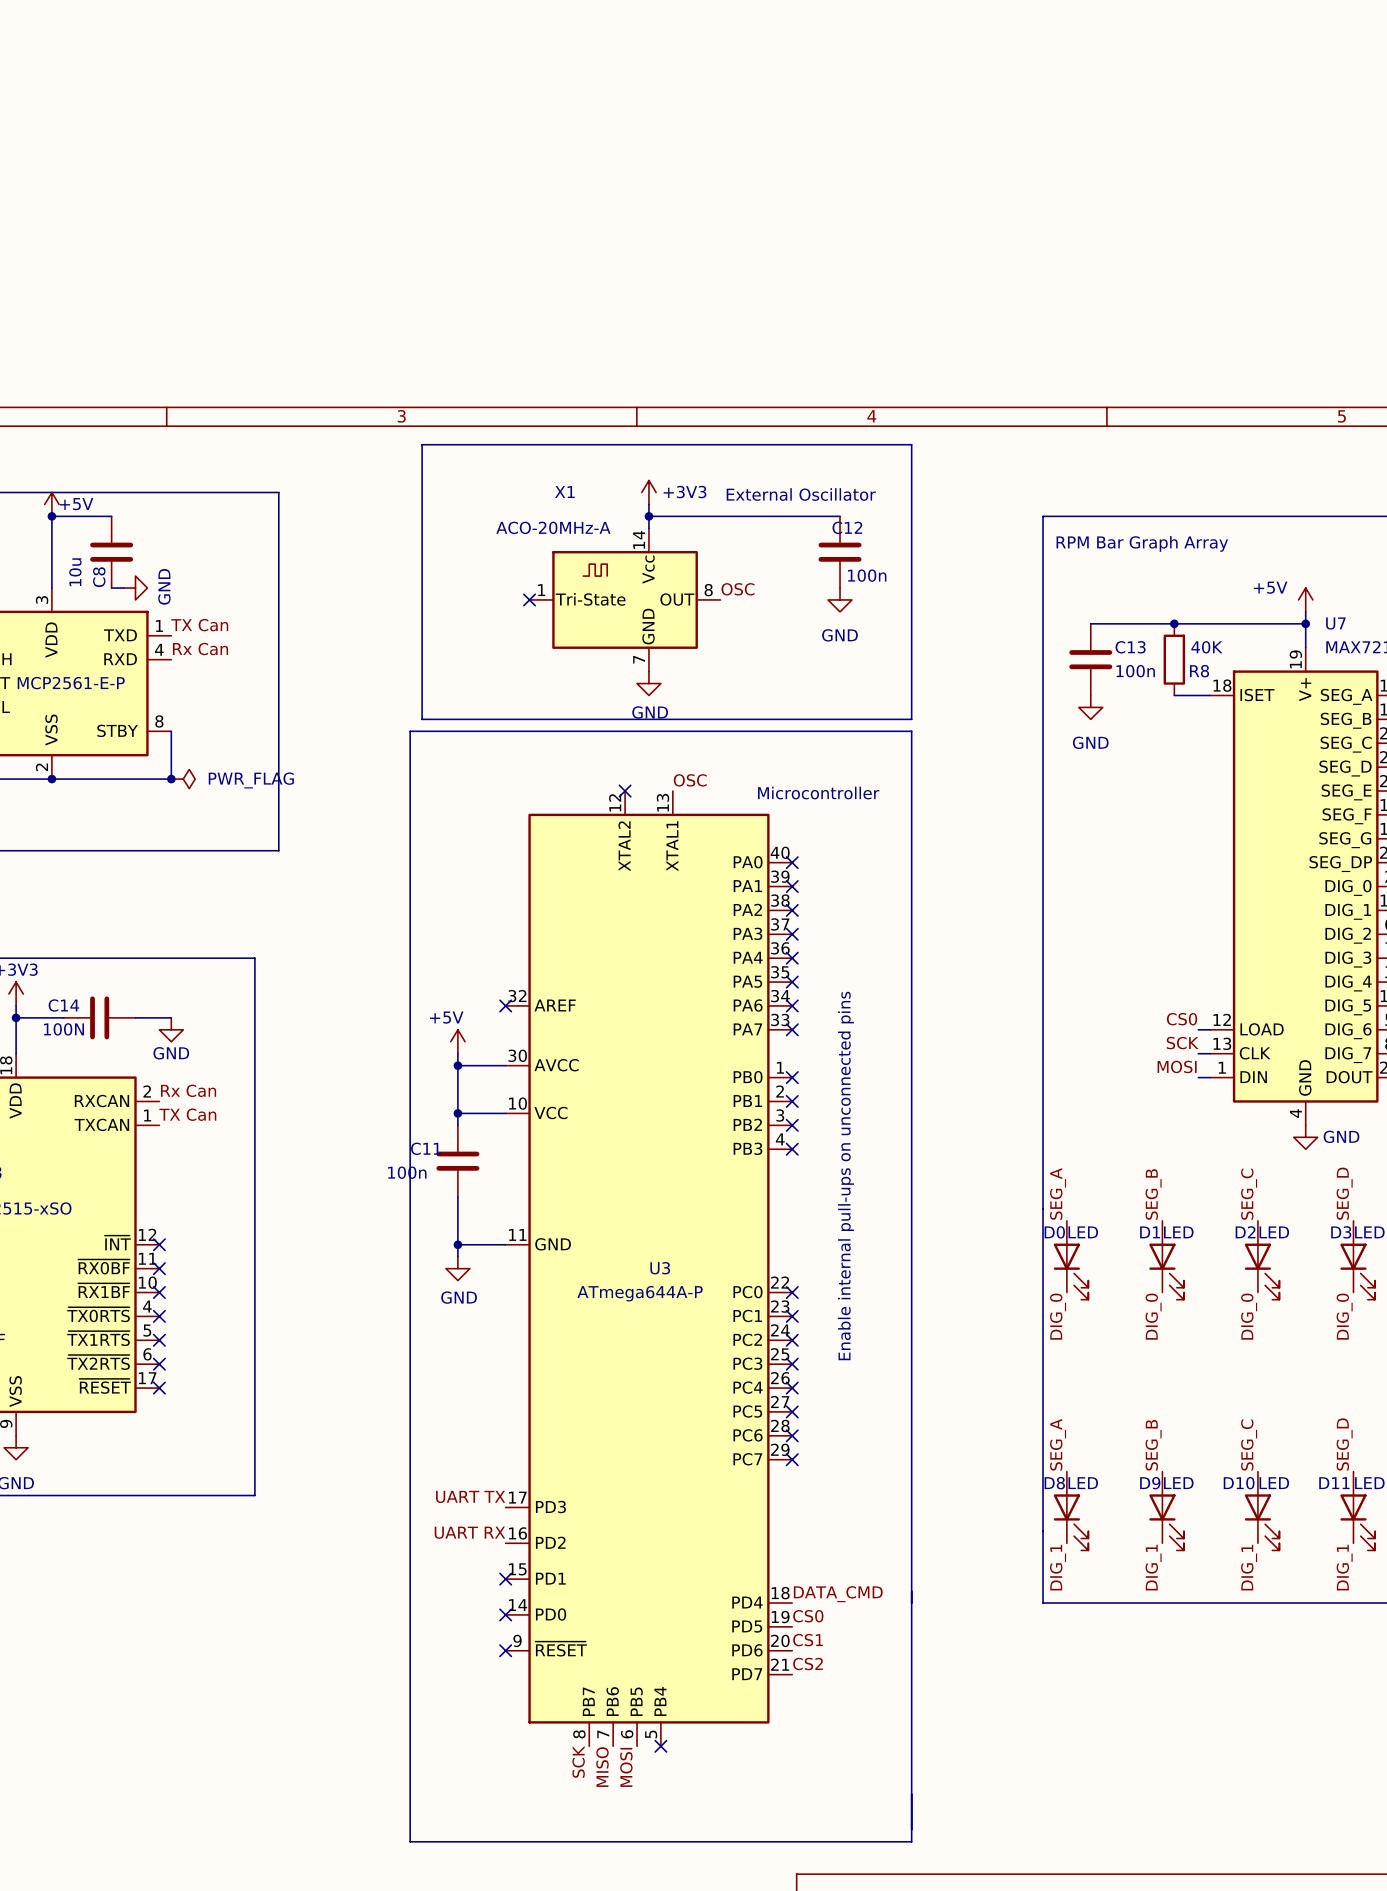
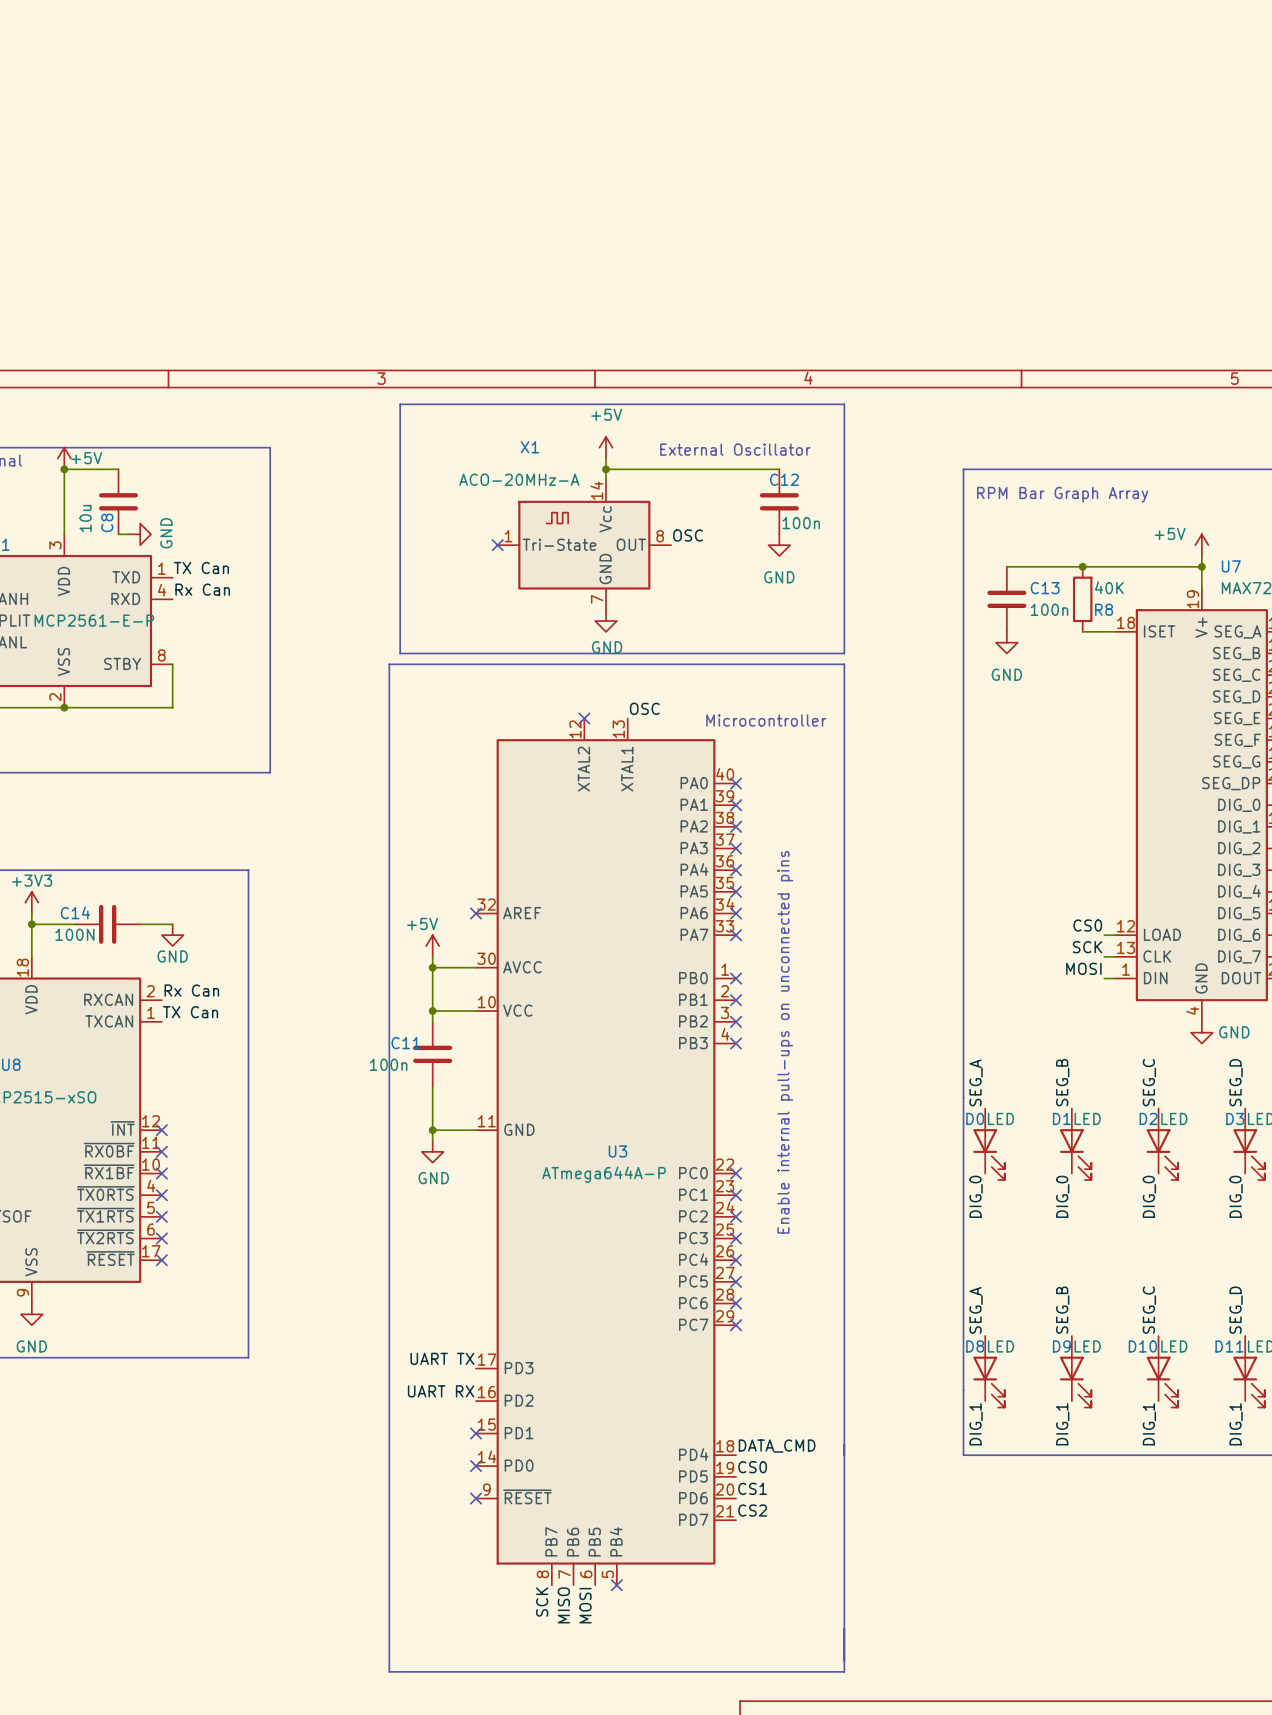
power symbol: +3V3 (648, 492) -> +5V (606, 447)
junction: (171, 779) -> none
power symbol: PWR_FLAG (183, 779) -> none

